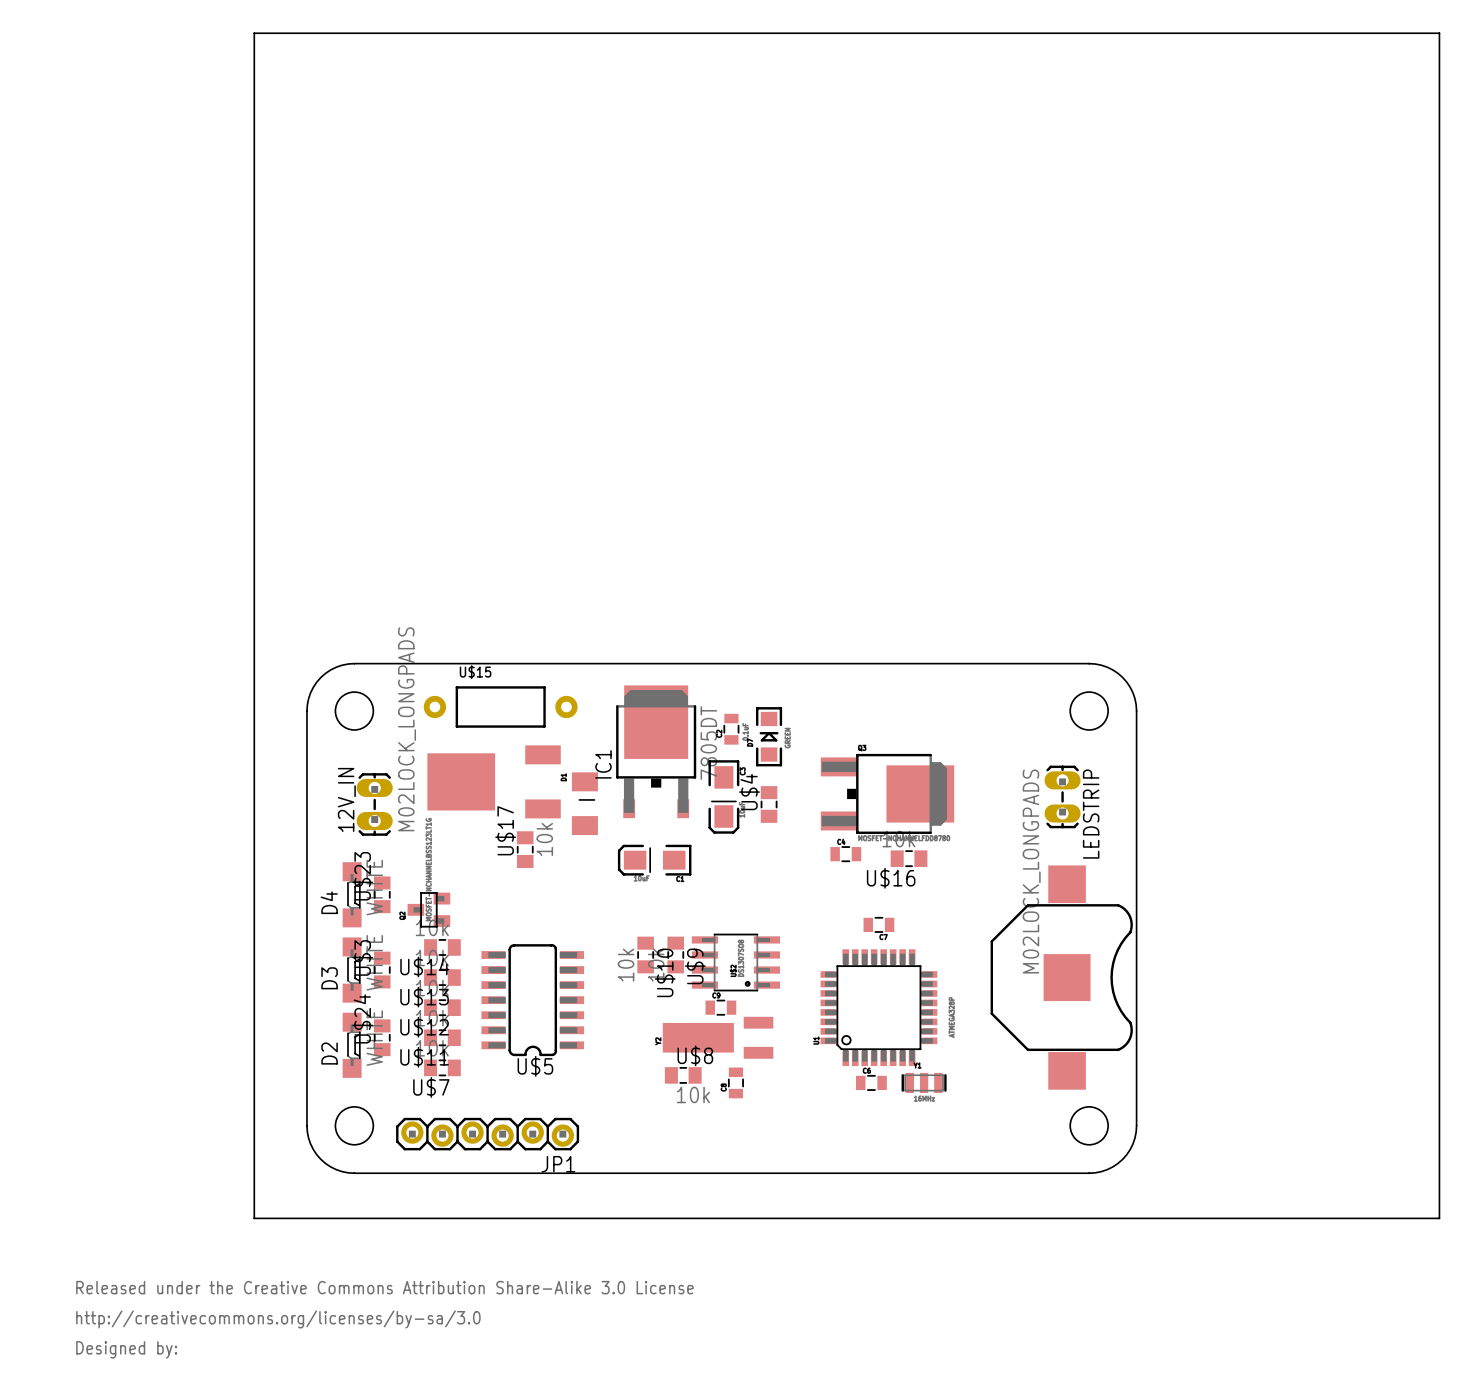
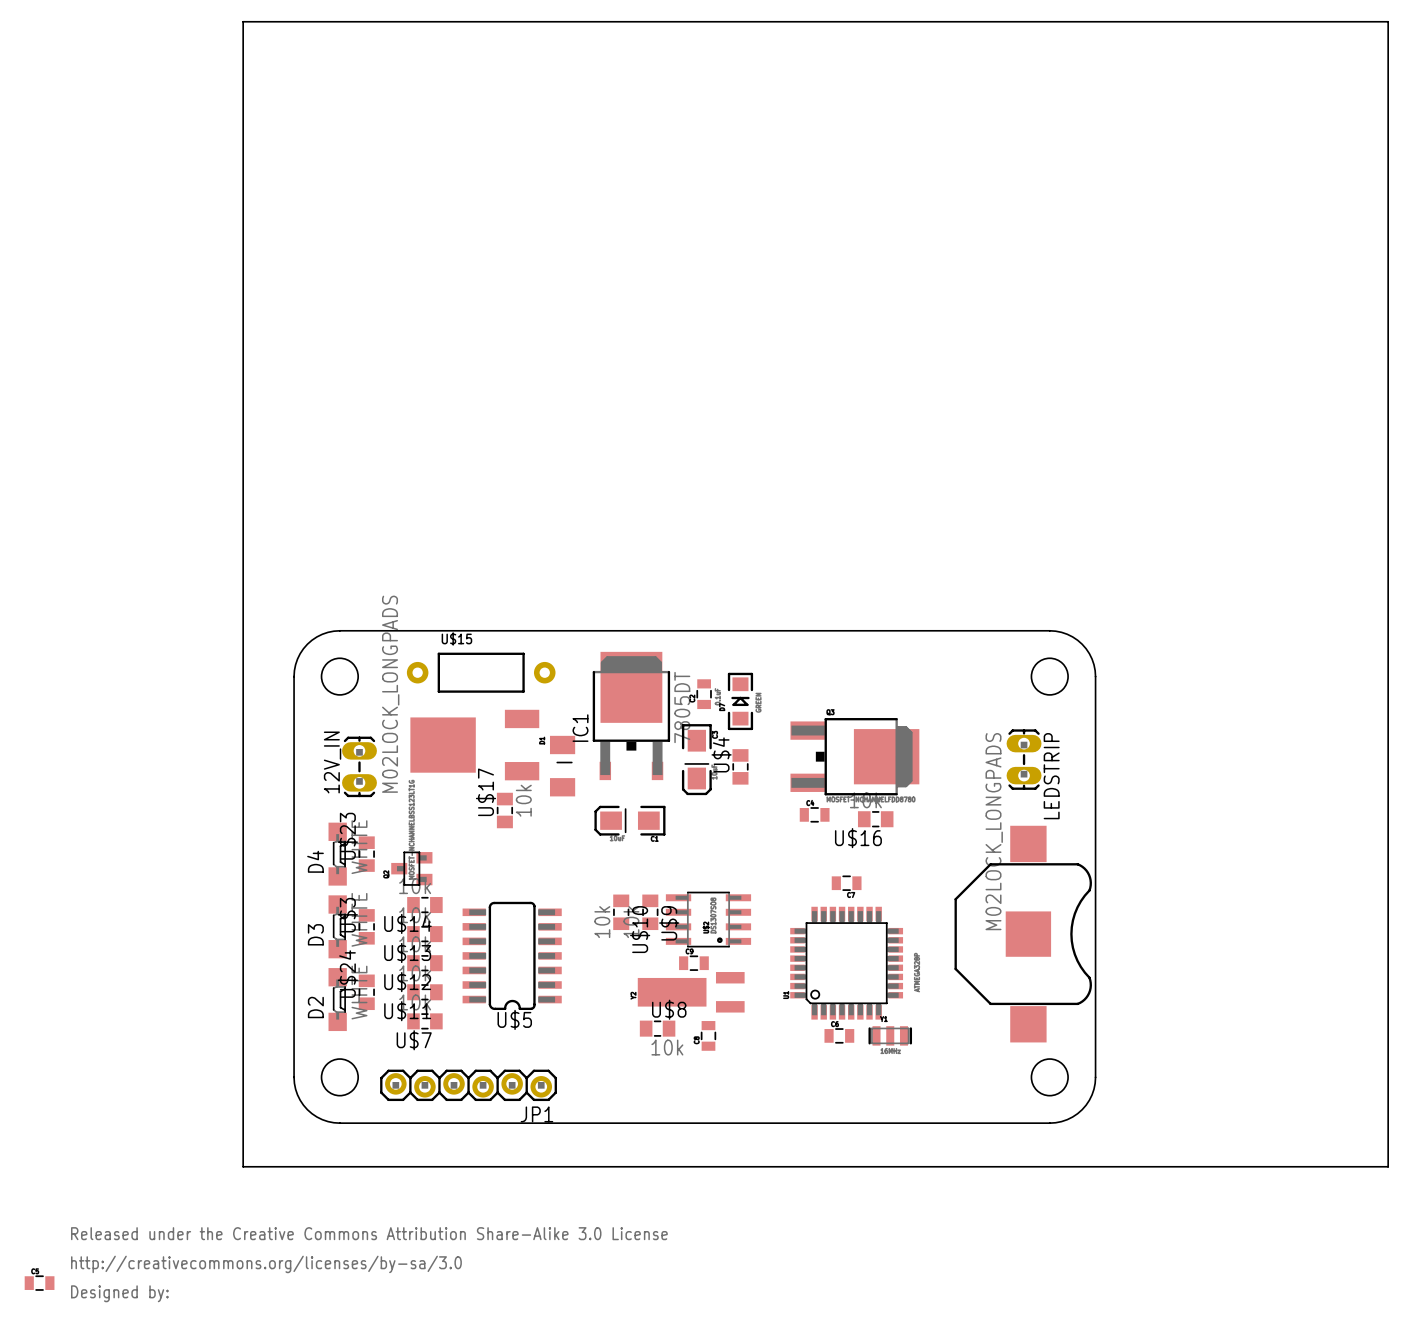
part: none -> (39, 1283)

